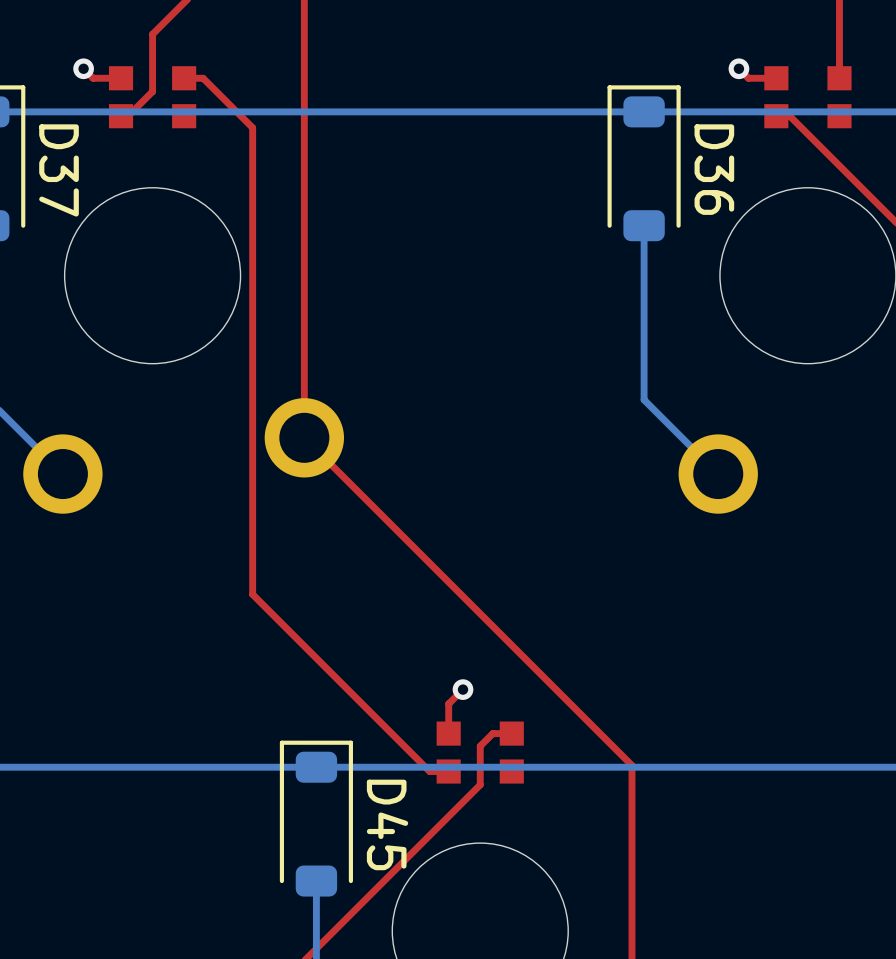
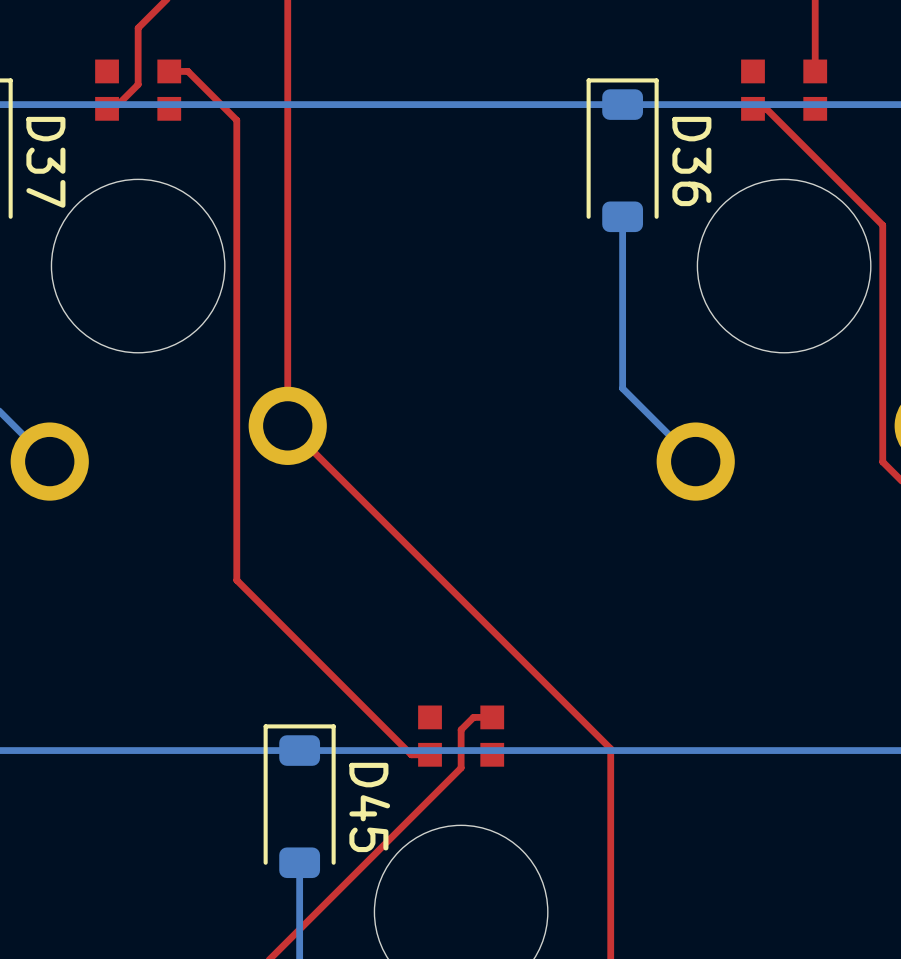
top track: (83, 68) (93, 78) (121, 78) -> none
via: (83, 68) -> none
top track: (738, 68) (748, 78) (776, 78) -> none
via: (738, 68) -> none
top track: (463, 689) (448, 703) (448, 733) -> none
via: (463, 689) -> none

